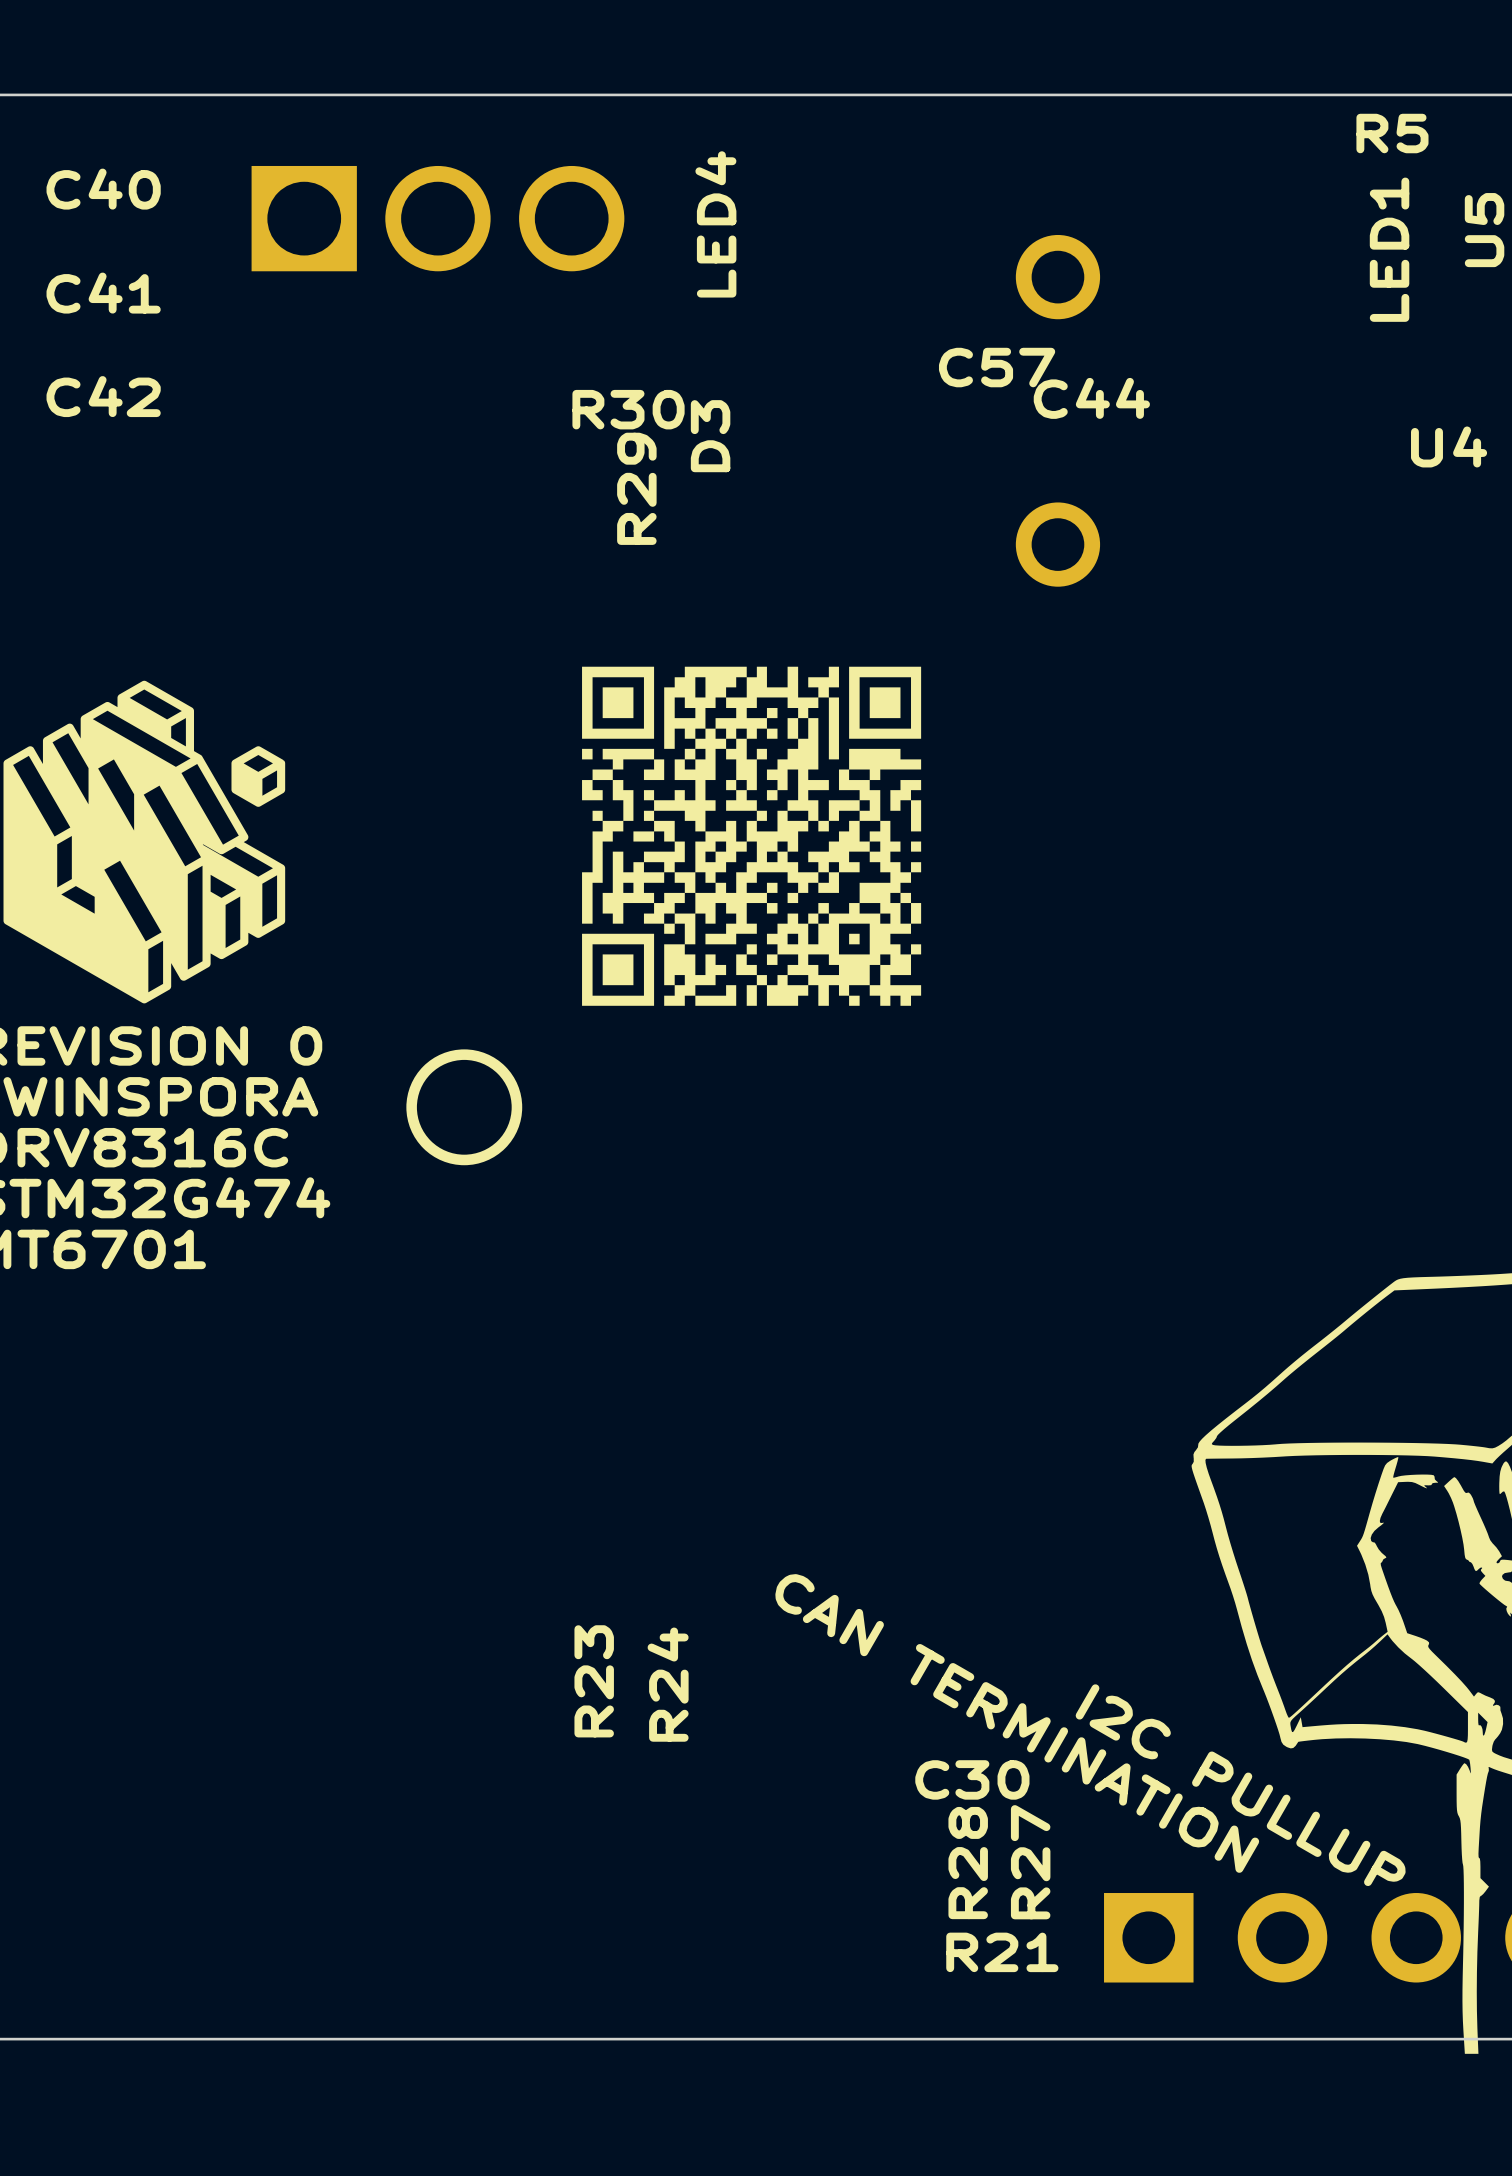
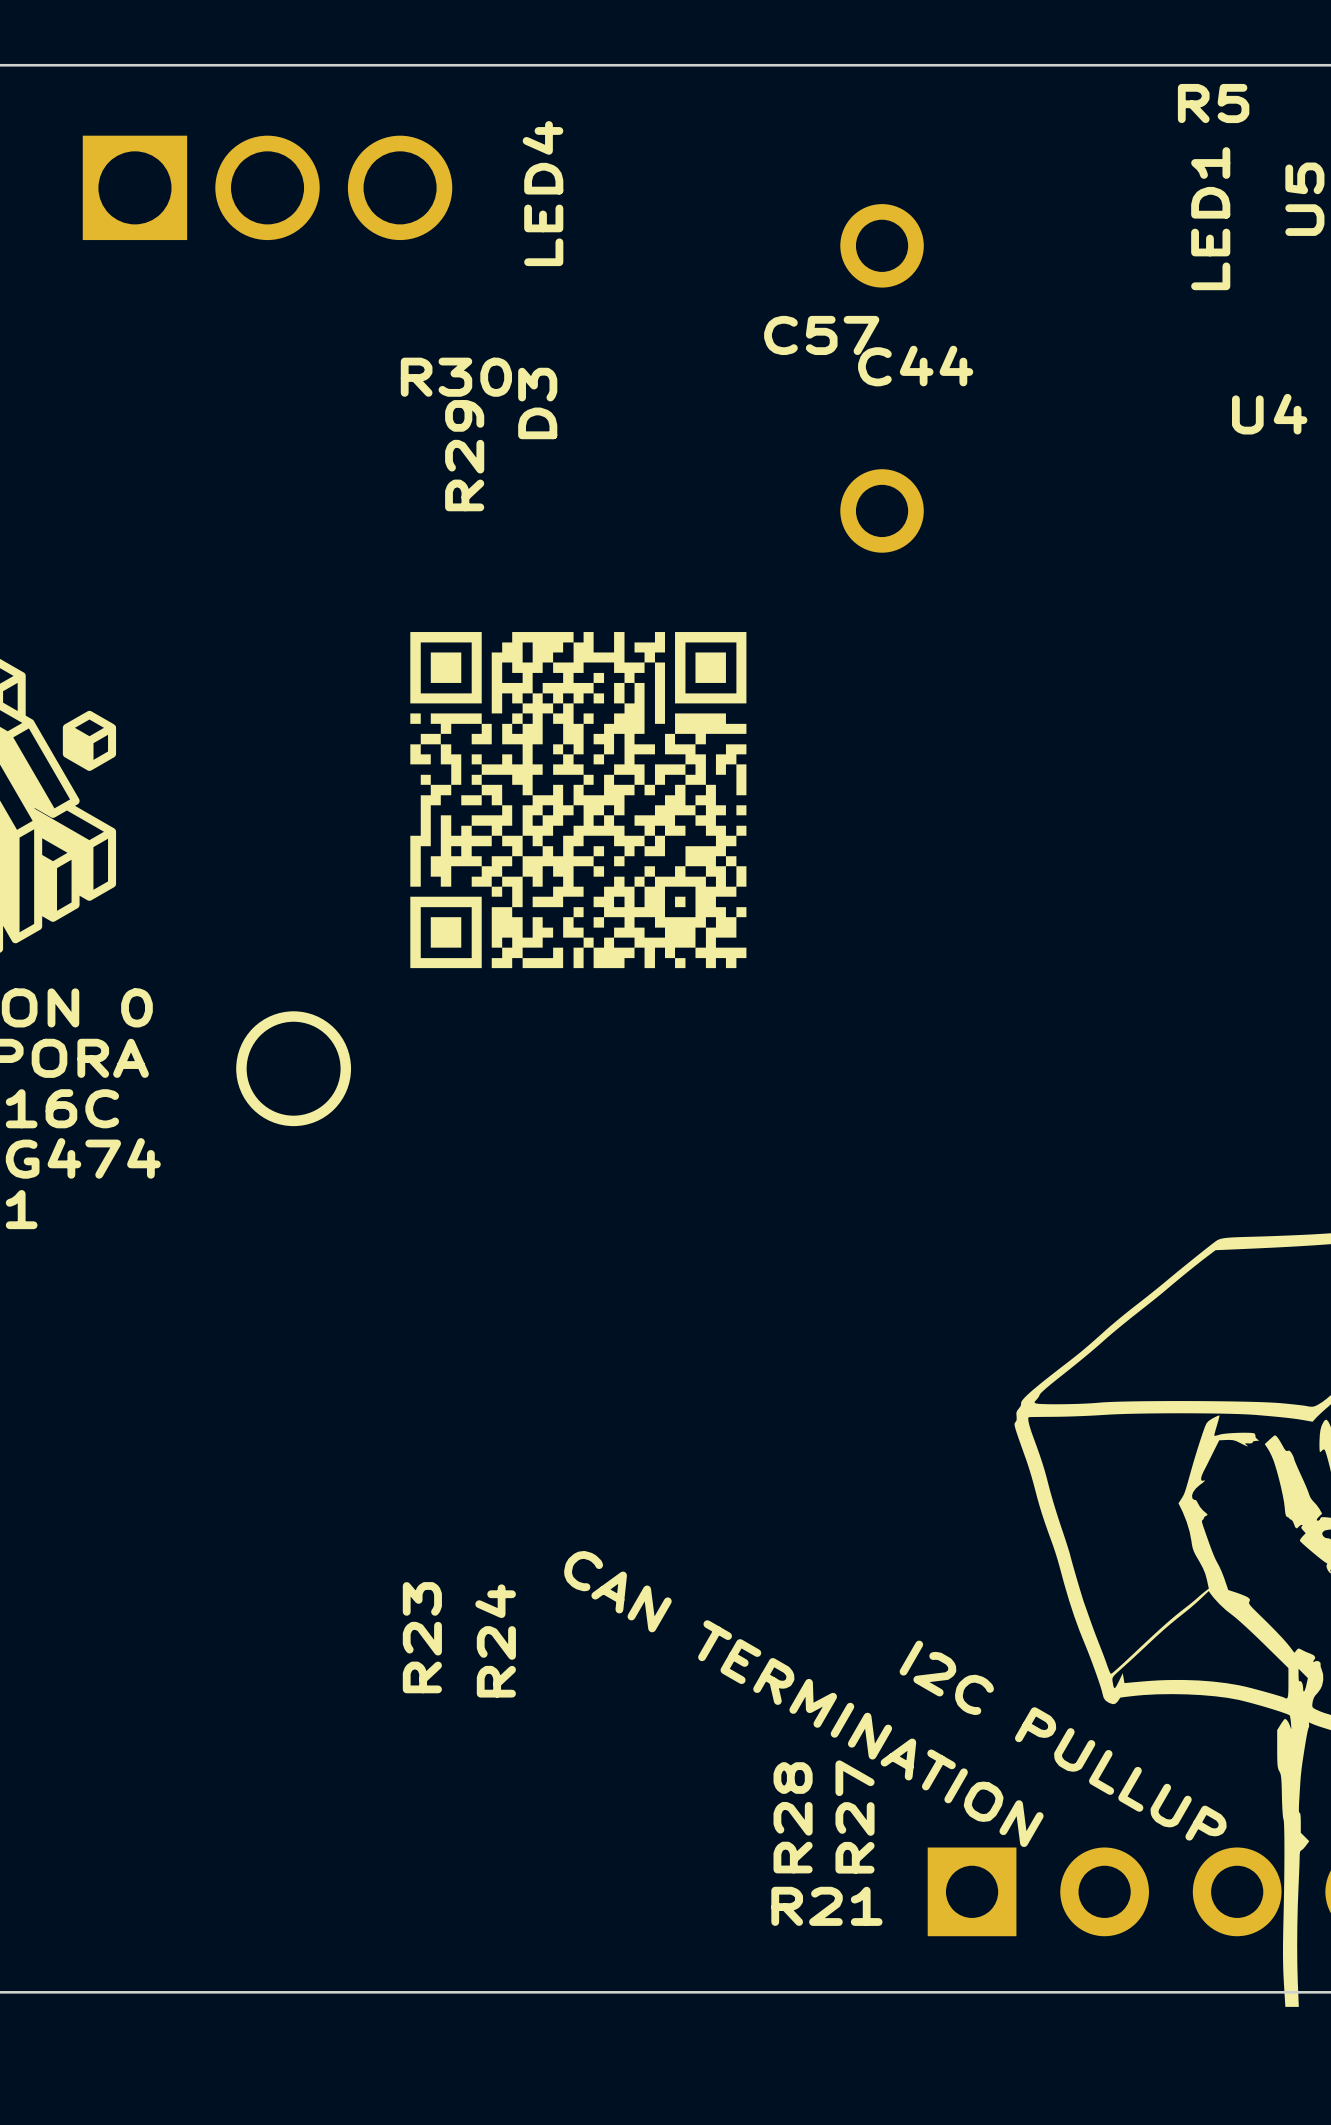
text position: CAN TERMINATION (1017, 1723) -> CAN TERMINATION (803, 1699)
C30: (972, 1779) -> none

